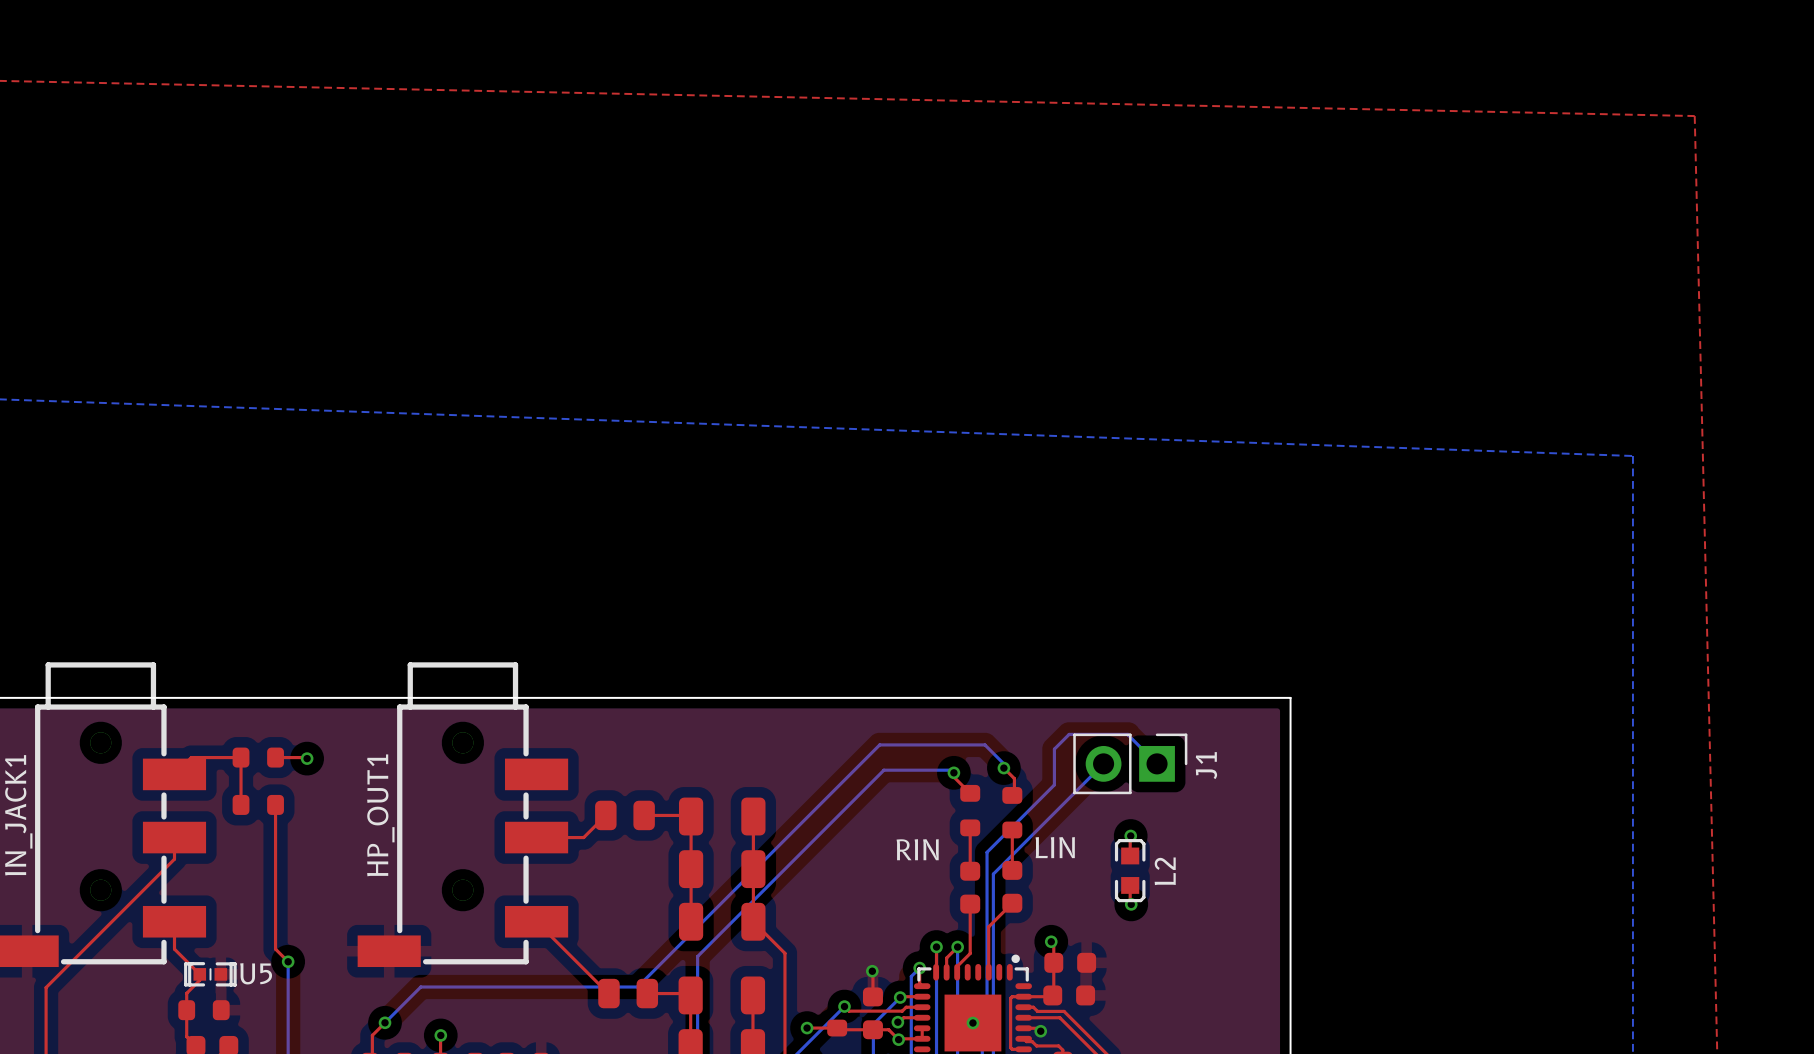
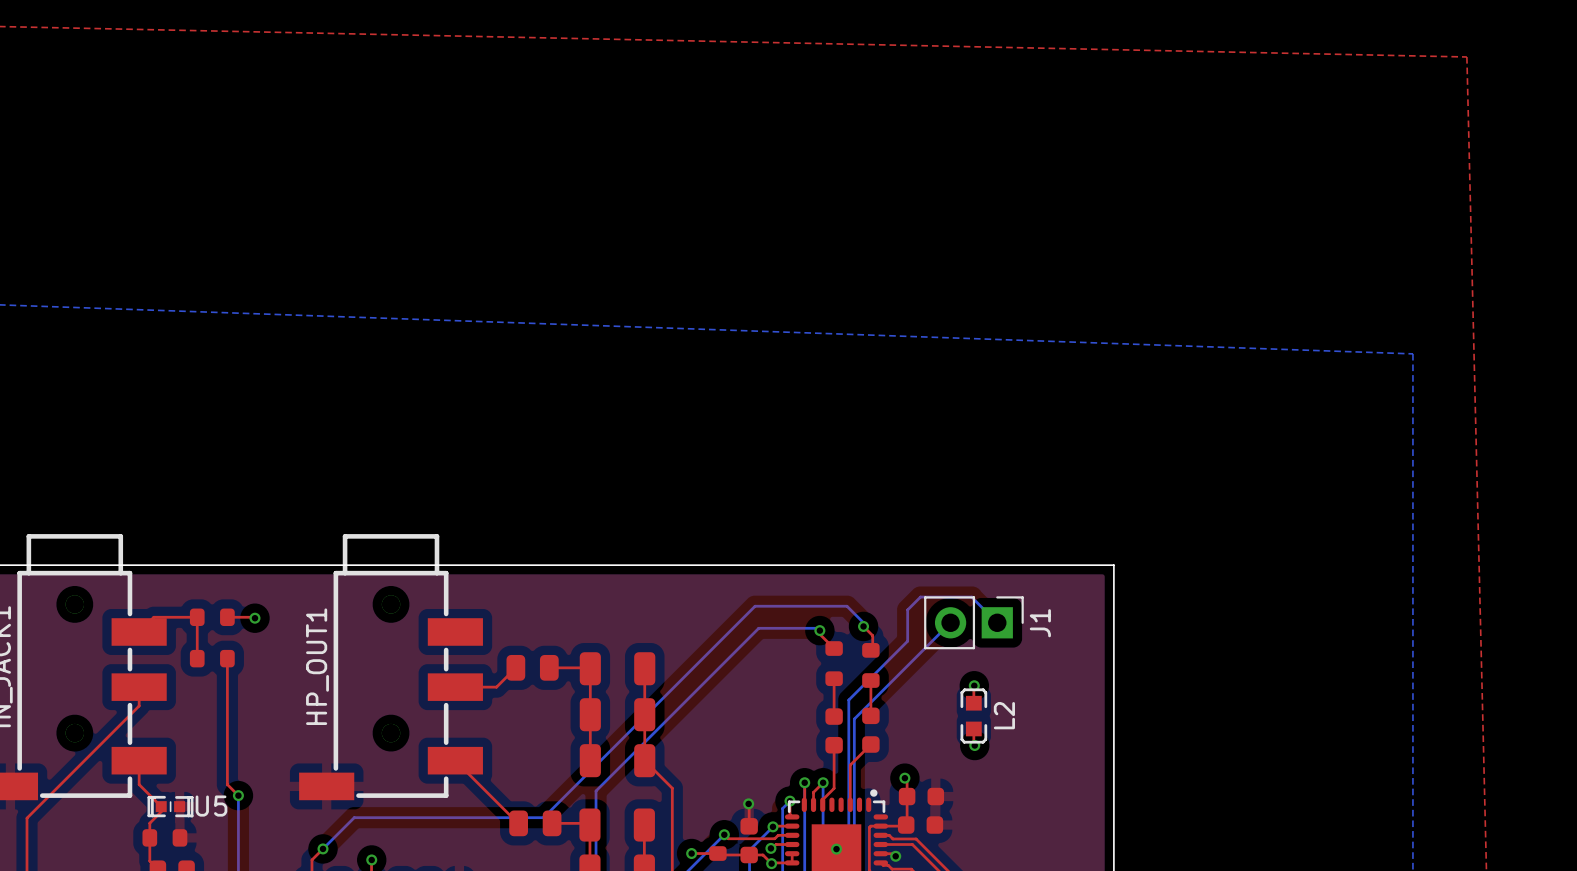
text: LIN (1055, 847) -> none
text: RIN (917, 849) -> none

